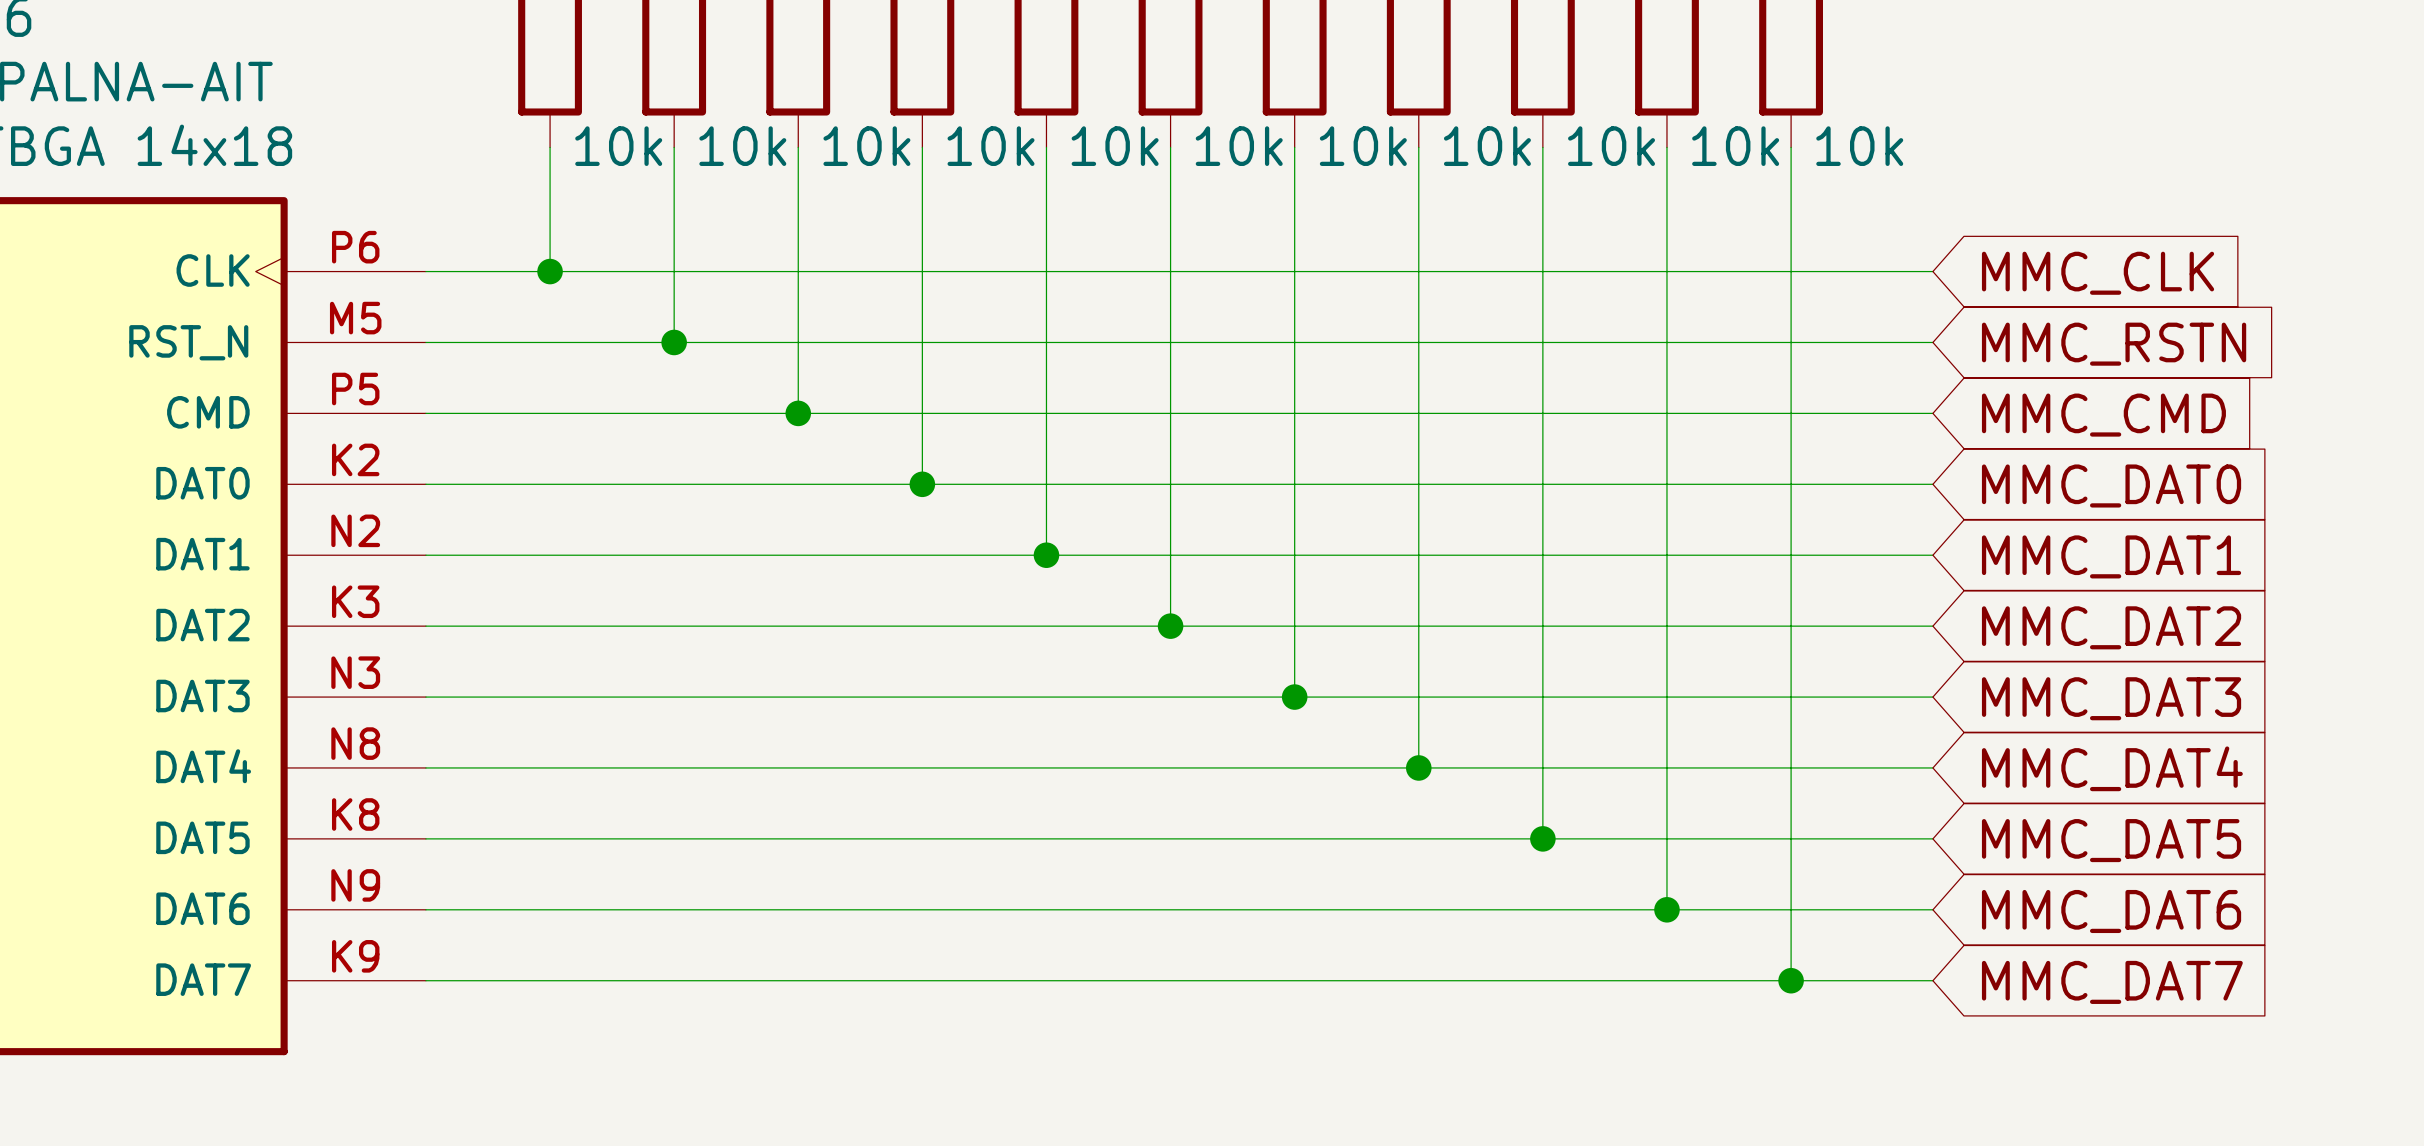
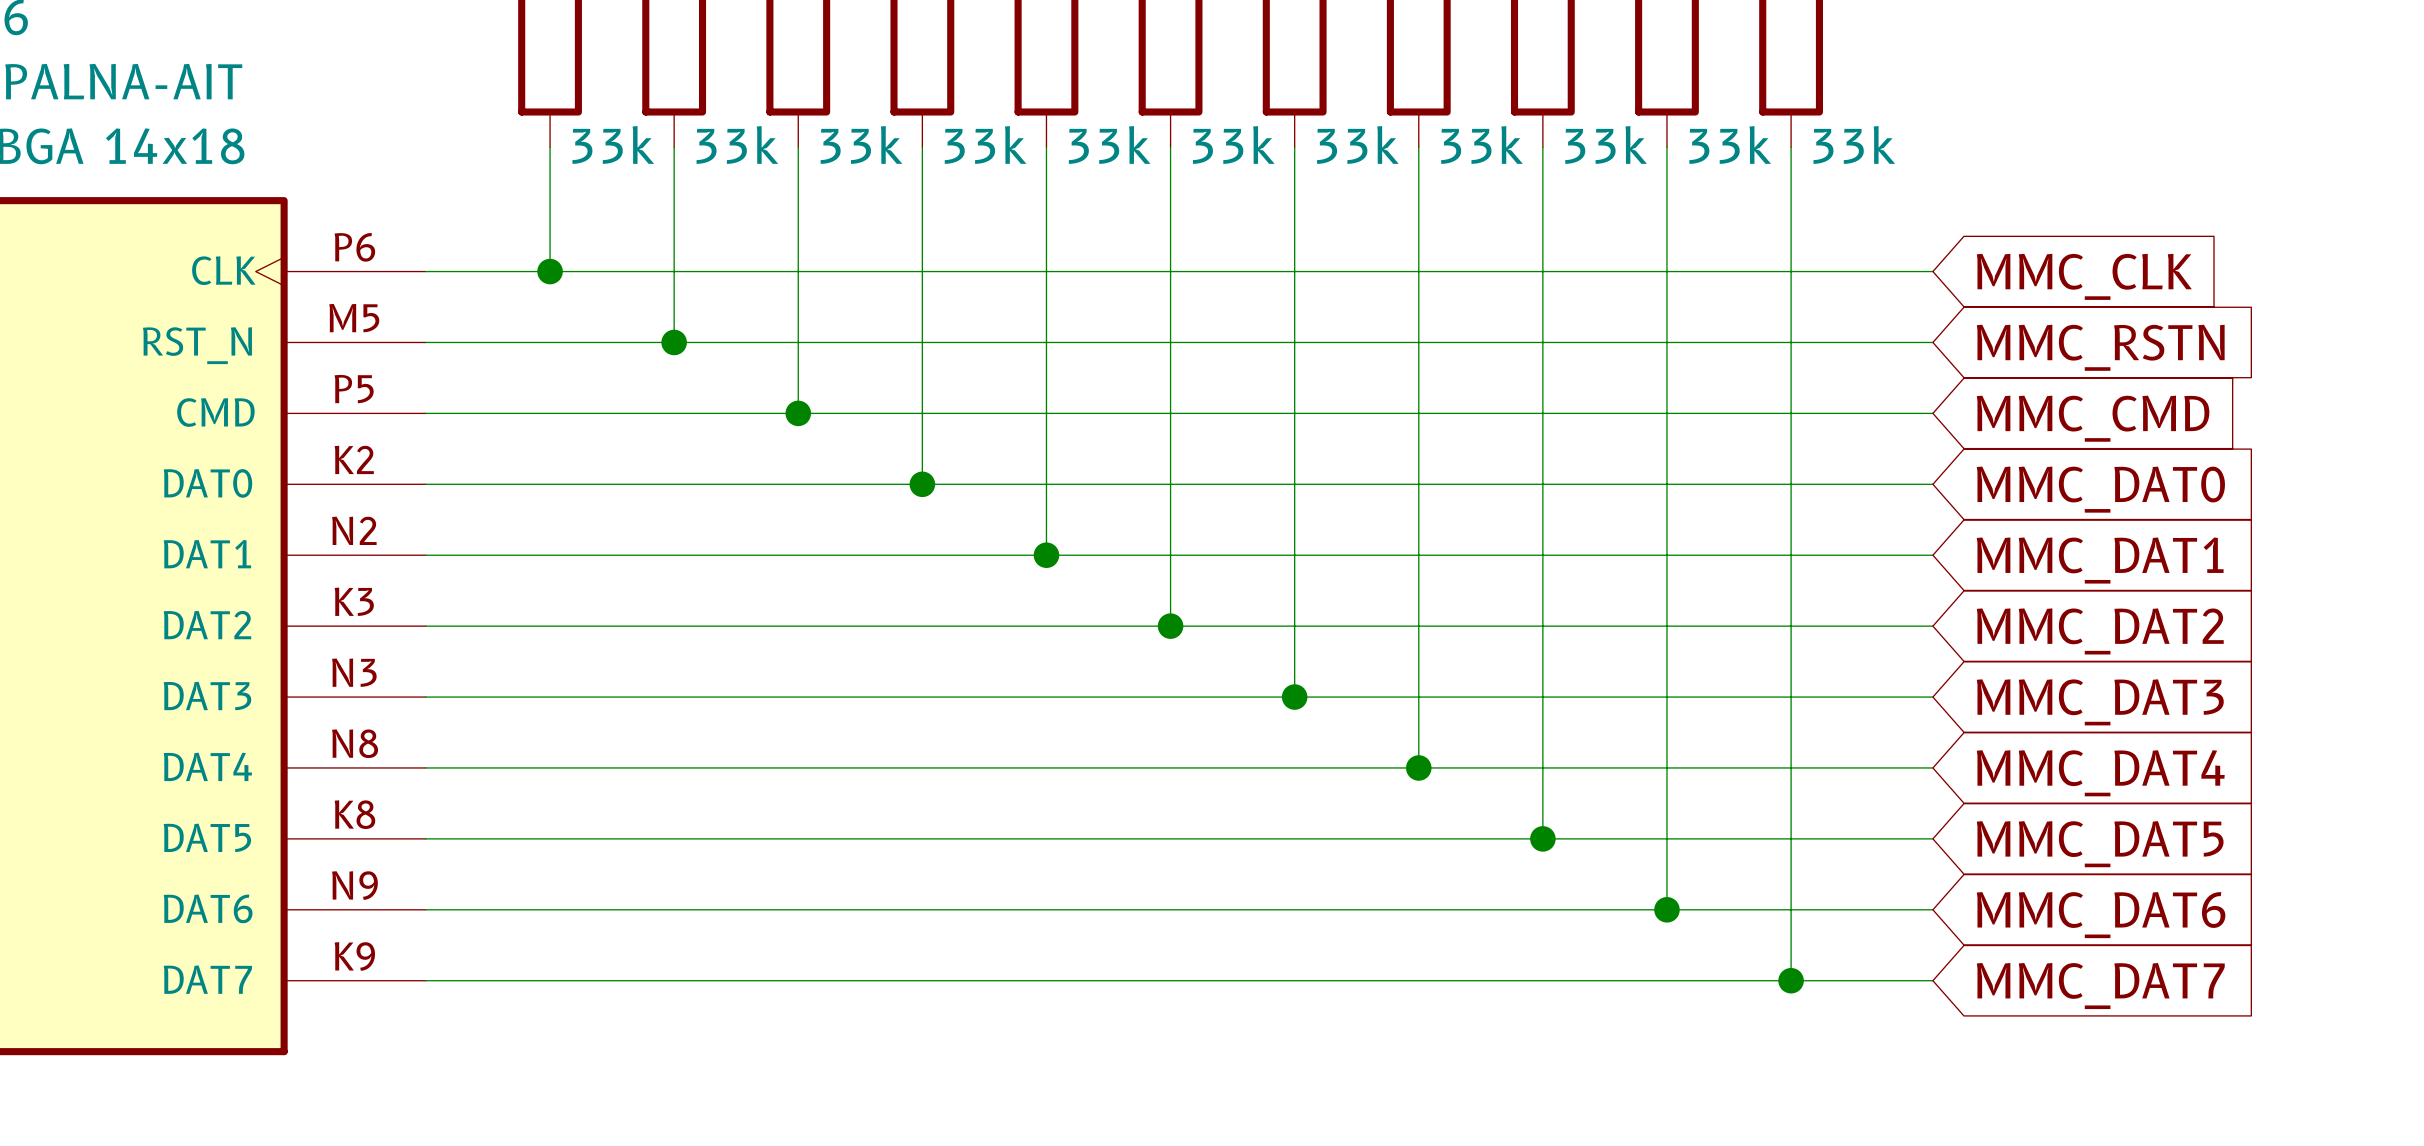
part text: 10k (618, 146) -> 33k (613, 144)
part text: 10k (742, 146) -> 33k (737, 144)
part text: 10k (866, 146) -> 33k (861, 144)
part text: 10k (991, 146) -> 33k (985, 144)
part text: 10k (1115, 146) -> 33k (1109, 144)
part text: 10k (1239, 146) -> 33k (1233, 144)
part text: 10k (1363, 146) -> 33k (1357, 144)
part text: 10k (1487, 146) -> 33k (1481, 144)
part text: 10k (1611, 146) -> 33k (1606, 144)
part text: 10k (1735, 146) -> 33k (1730, 144)
part text: 10k (1859, 146) -> 33k (1854, 144)

